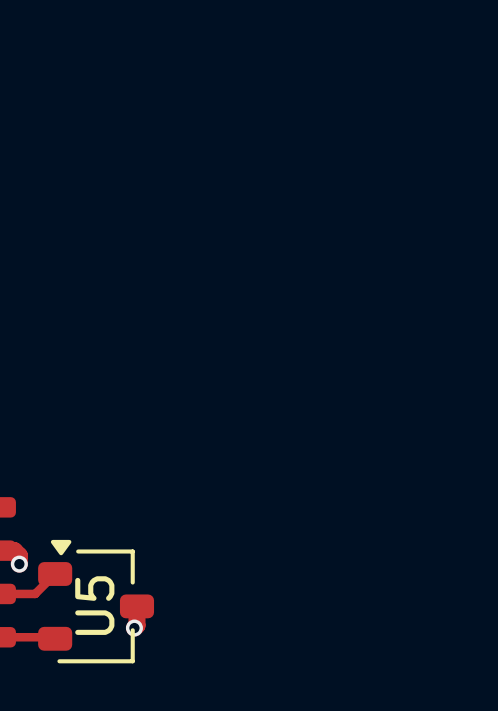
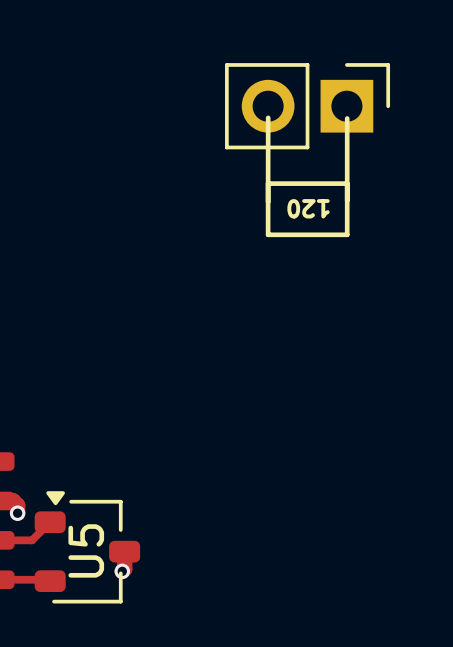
part: none -> (307, 106)
line: none -> (268, 117) (268, 202)
line: none -> (347, 118) (347, 234) (268, 234) (268, 183) (347, 183)
text: none -> 120 (308, 208)

